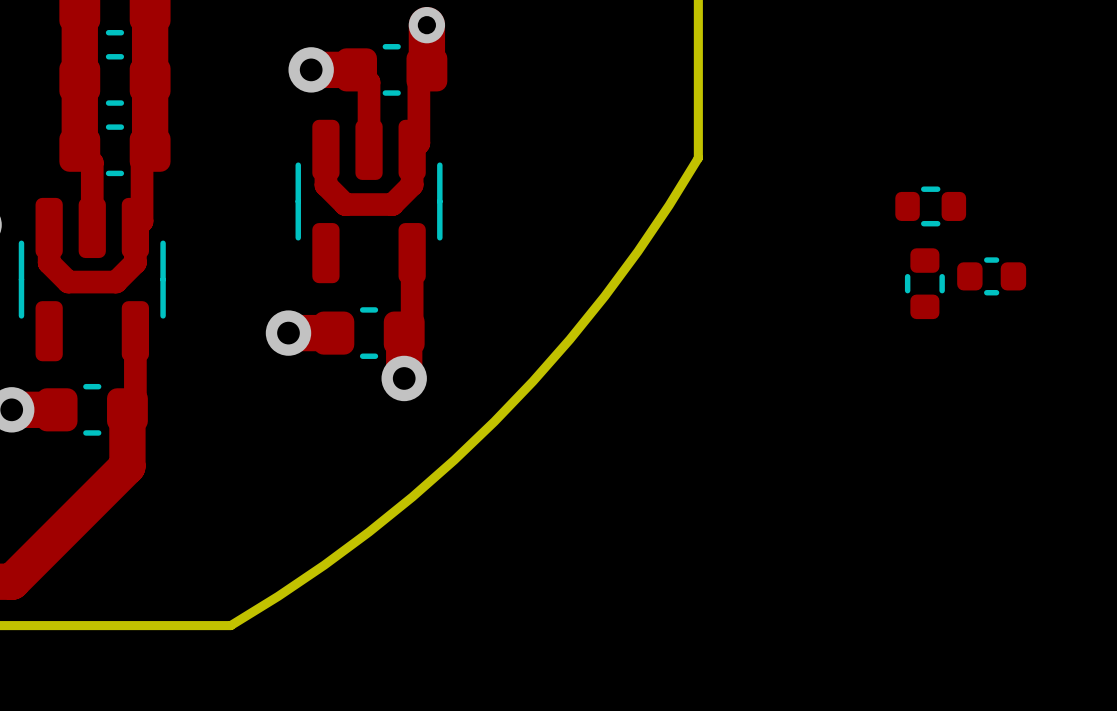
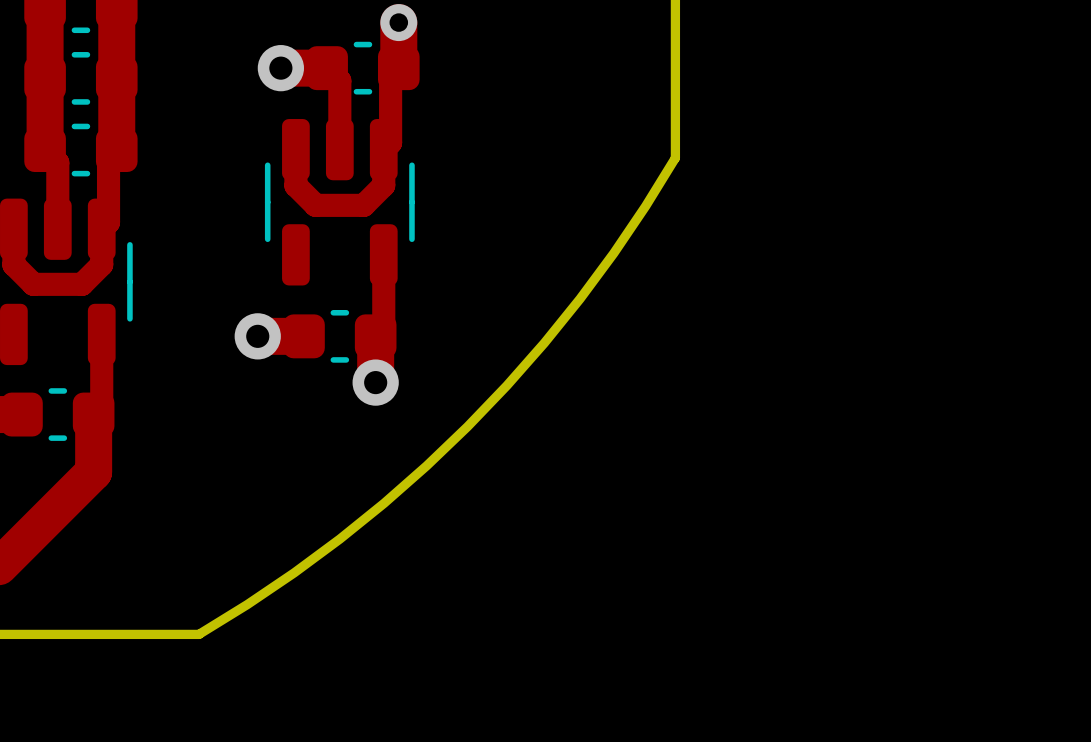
part: (930, 206) -> none
part: (991, 276) -> none
part: (924, 283) -> none

